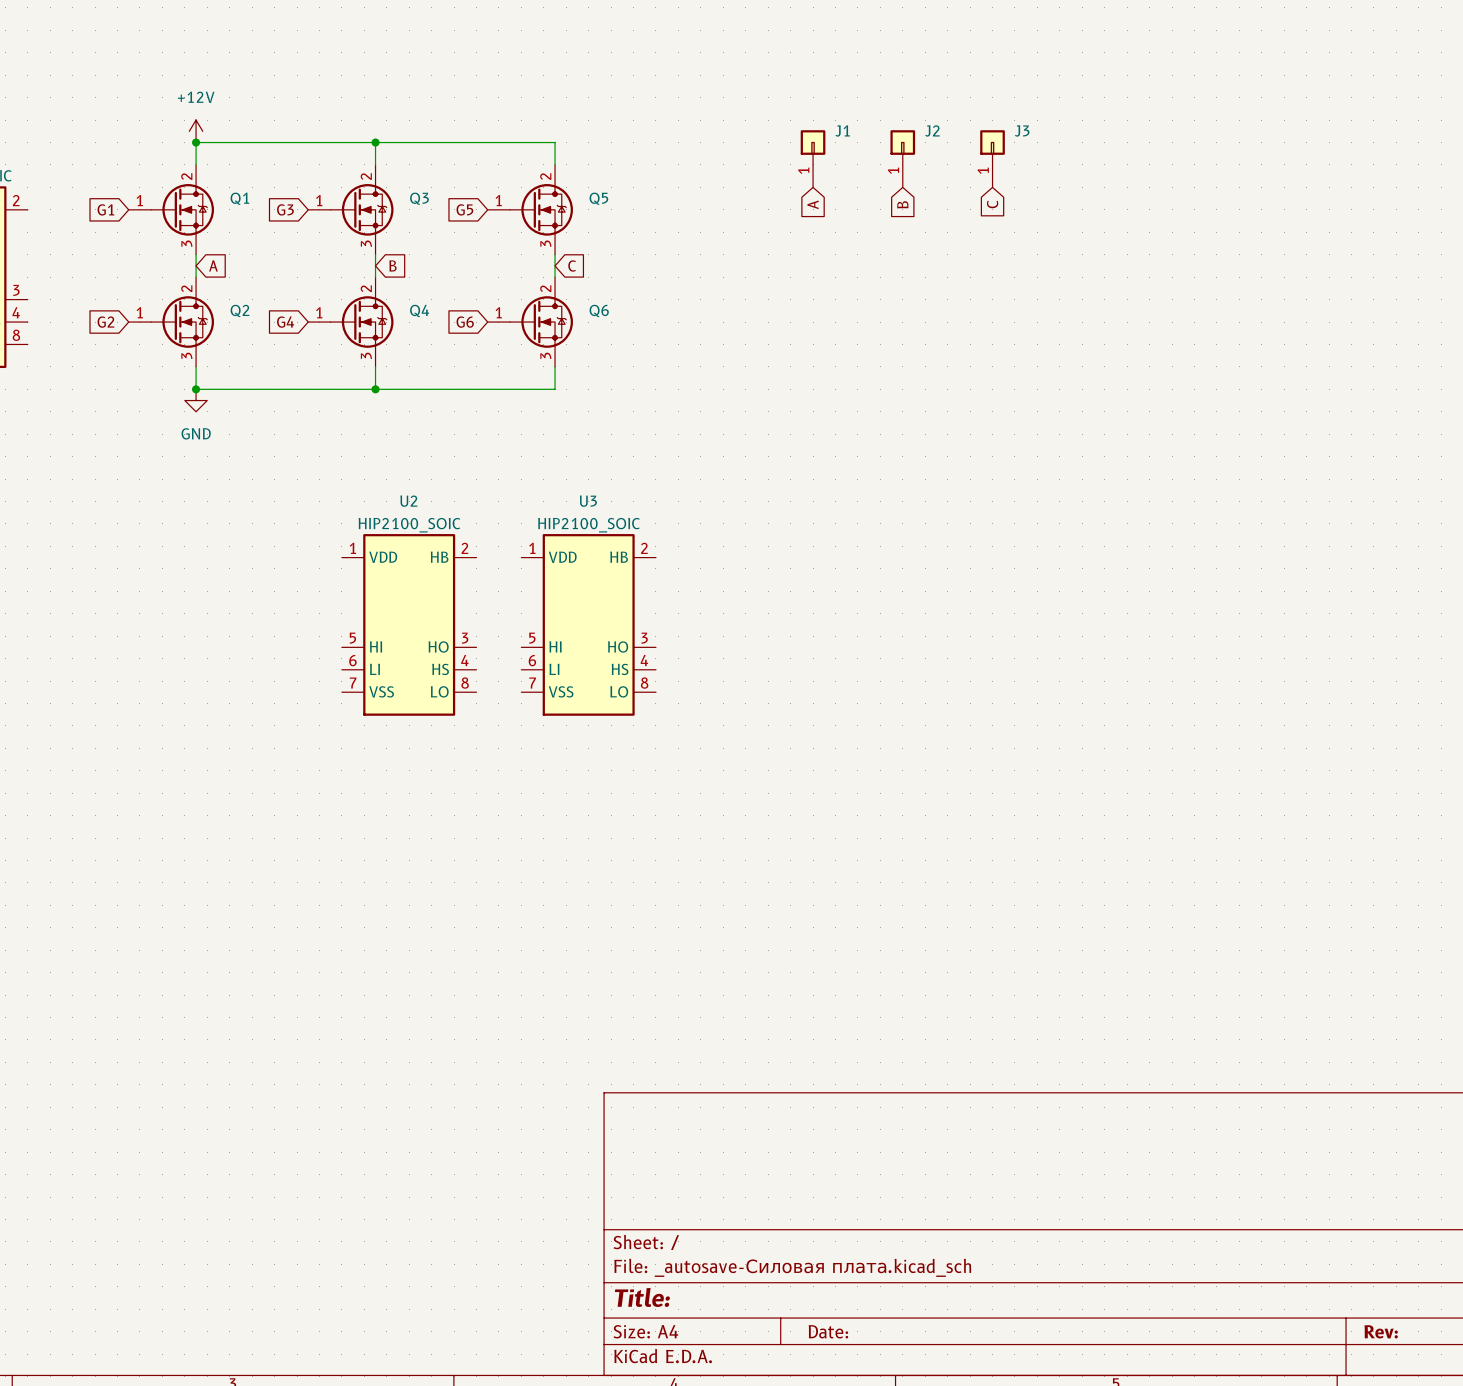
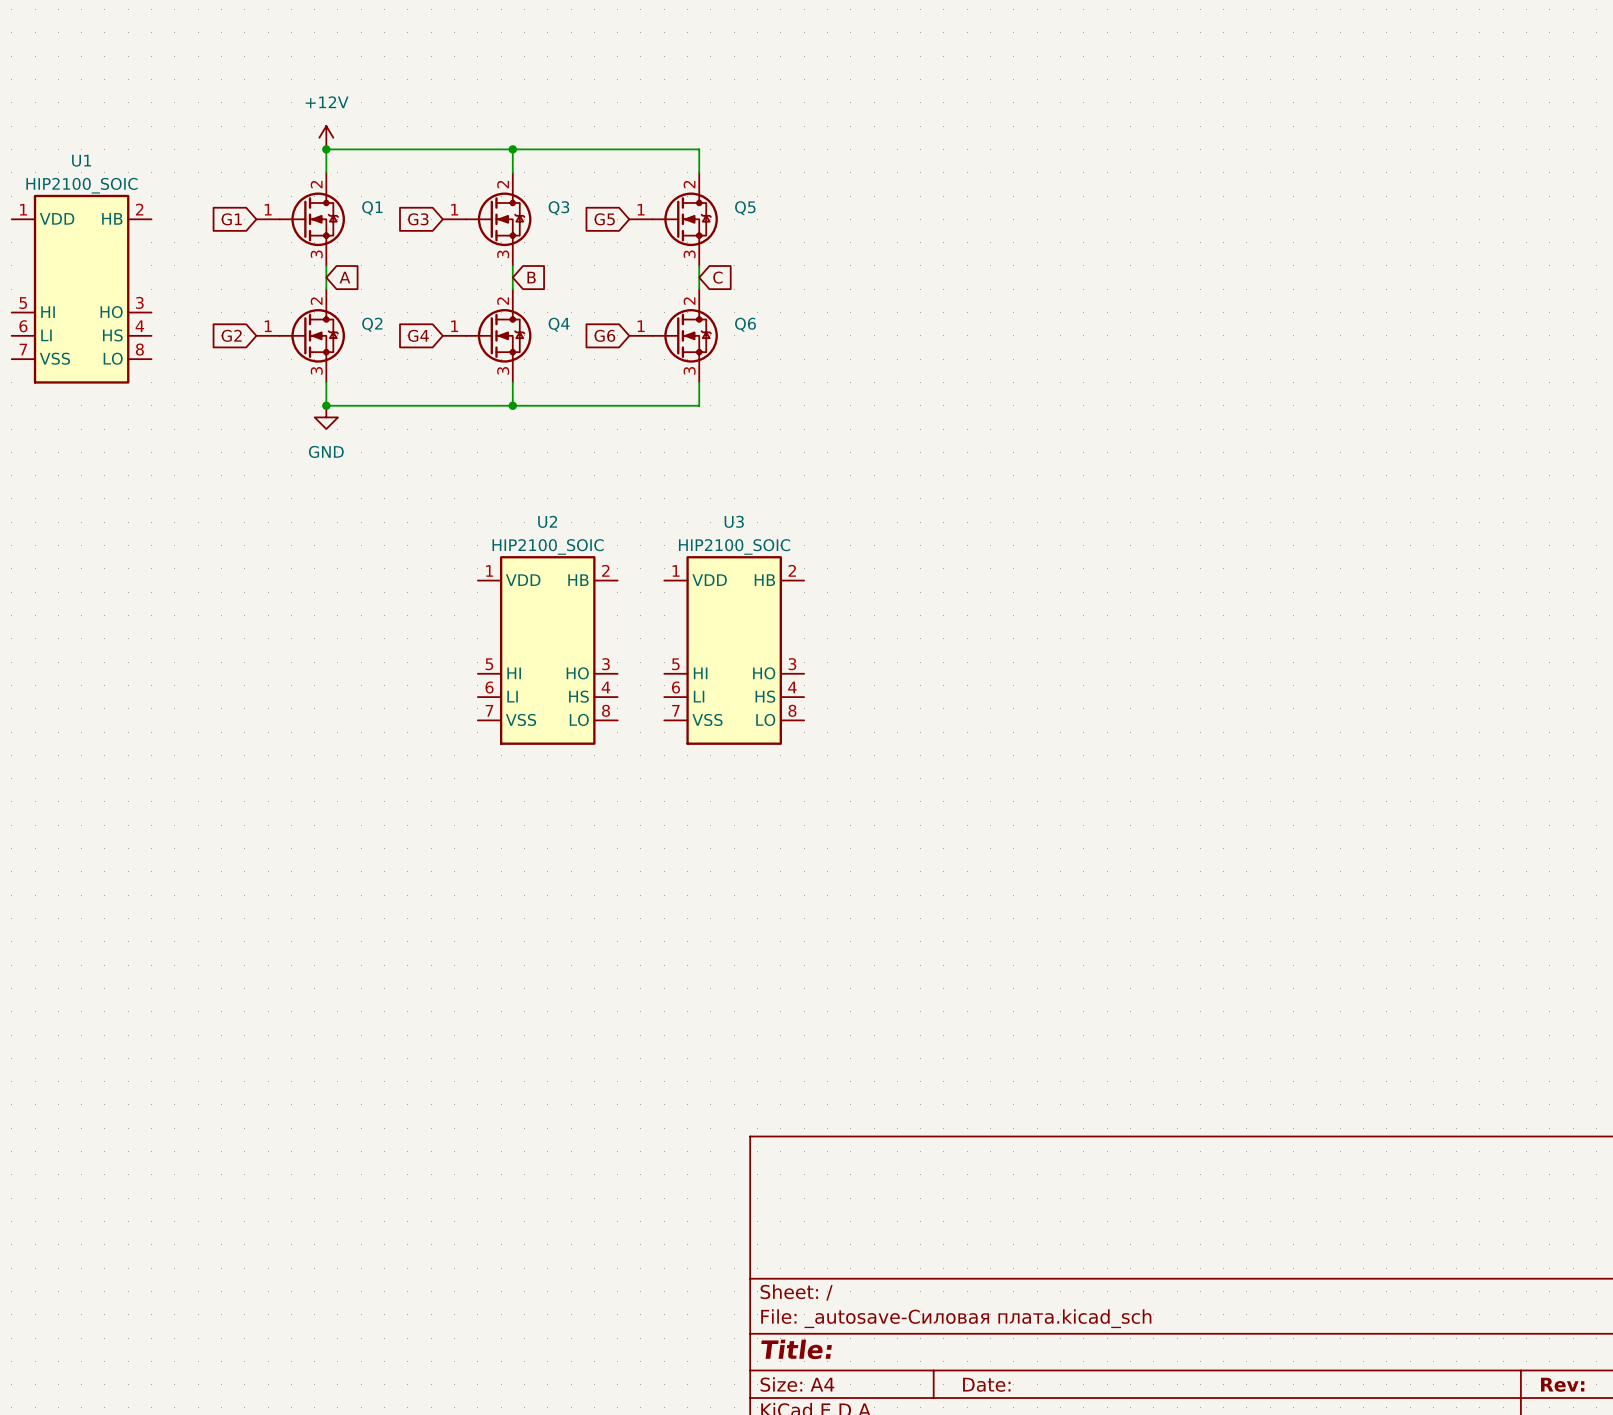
J1: (813, 158) -> none
J2: (902, 158) -> none
J3: (992, 158) -> none
global label: A (813, 204) -> none
global label: B (902, 204) -> none
global label: C (992, 204) -> none

